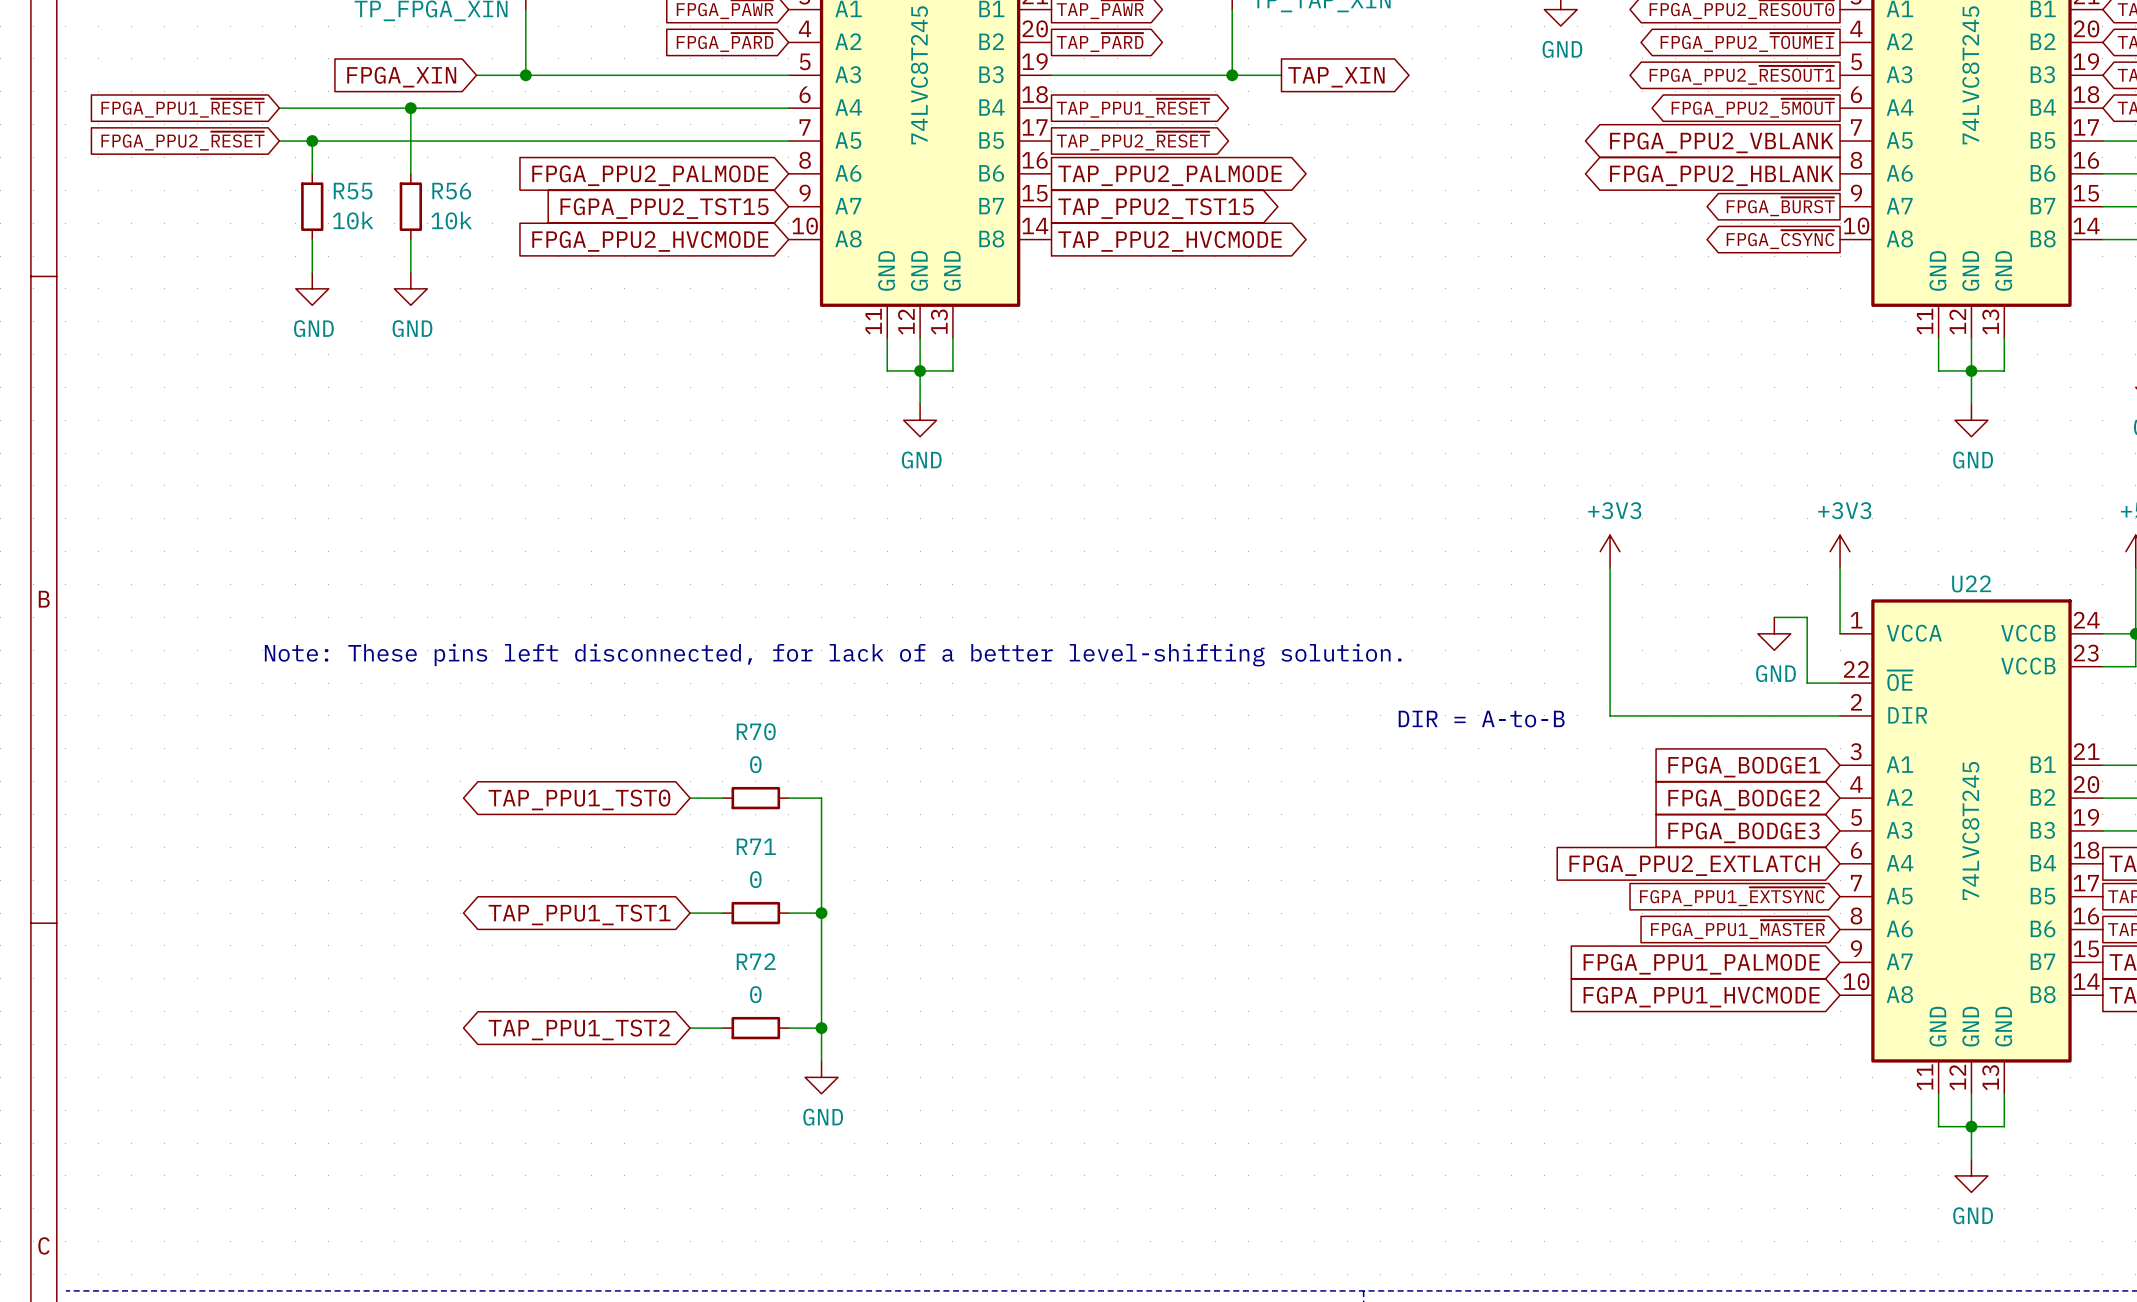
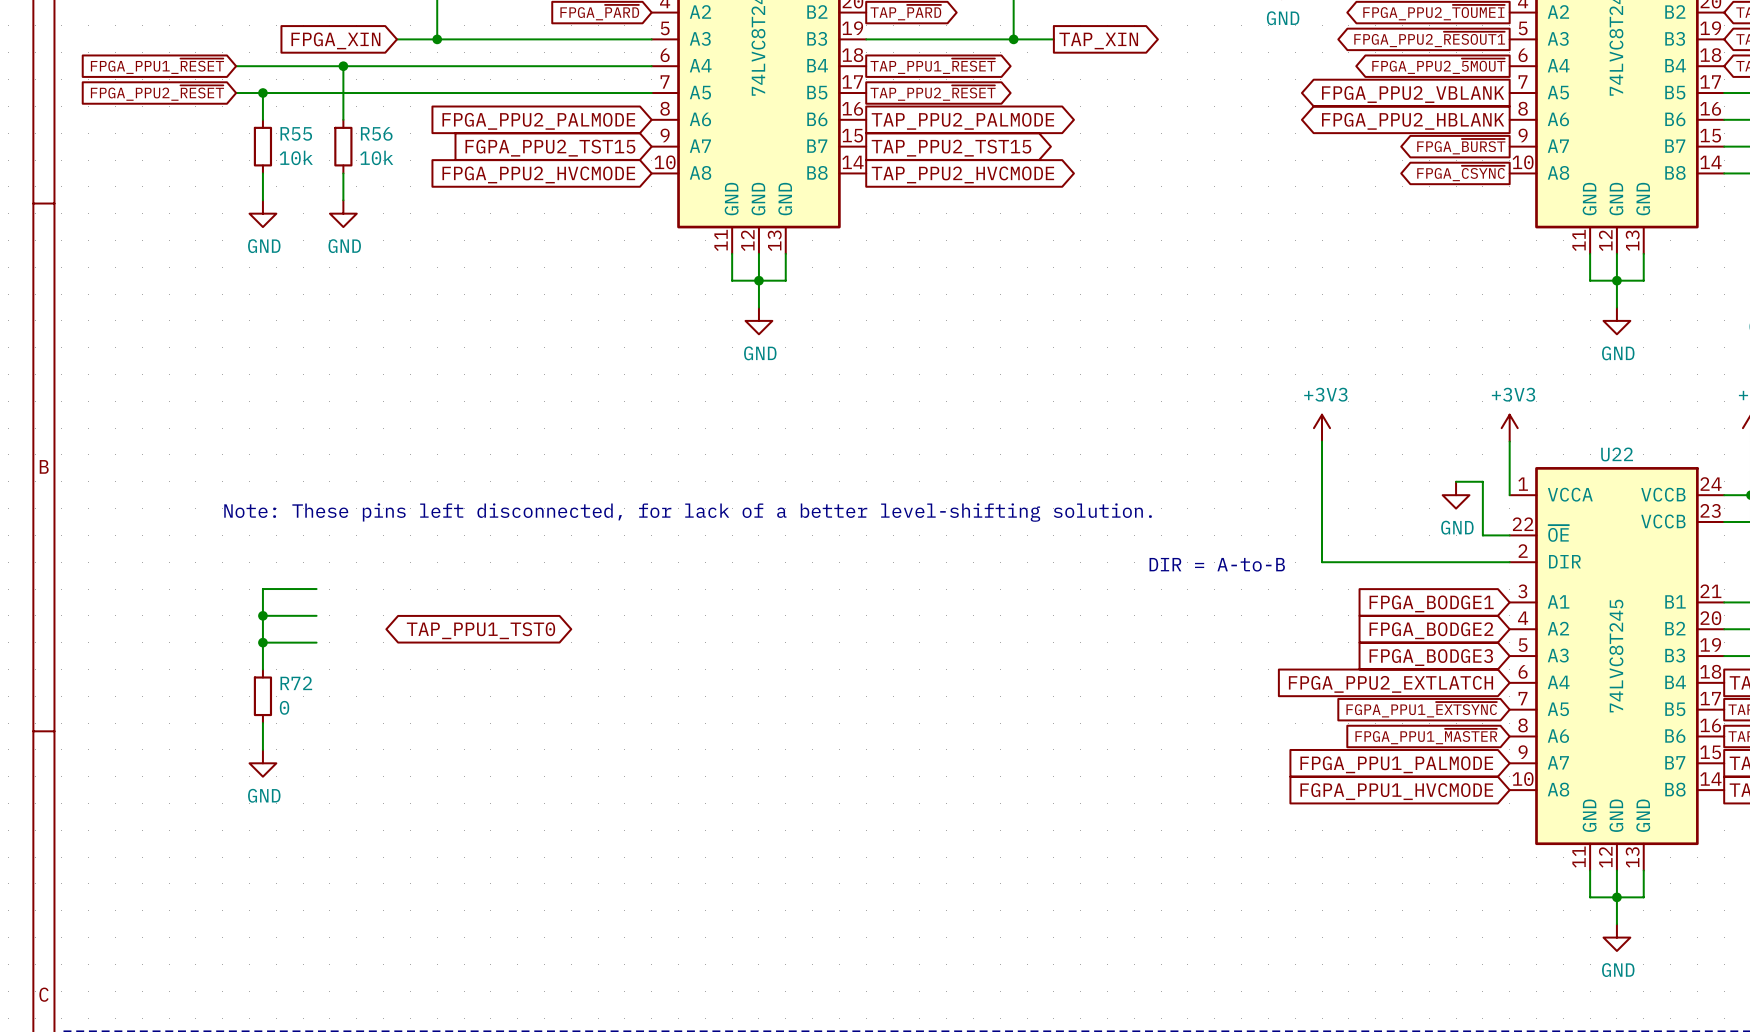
wire: none -> (316, 589) (262, 589) (262, 669)
wire: none -> (262, 615) (316, 615)
junction: none -> (262, 615)
wire: (690, 798) (722, 798) -> none
R70: 0 (755, 798) -> none
wire: (788, 798) (821, 798) (821, 1060) -> none
wire: none -> (262, 642) (316, 642)
junction: none -> (262, 642)
wire: none -> (262, 723) (262, 749)
wire: (690, 913) (722, 913) -> none
R71: 0 (755, 913) -> none
wire: (788, 913) (821, 913) -> none
junction: (821, 913) -> none
global label: TAP_PPU1_TST1 (579, 914) -> none
power symbol: none -> GND (262, 763)
wire: (690, 1028) (722, 1028) -> none
R72 rotation: 0° (755, 1028) -> 90° clockwise (262, 696)
R72 position: (755, 1028) -> (262, 696)
wire: (788, 1028) (821, 1028) -> none
junction: (821, 1028) -> none
global label: TAP_PPU1_TST2 (579, 1029) -> none
power symbol: GND (821, 1077) -> none

